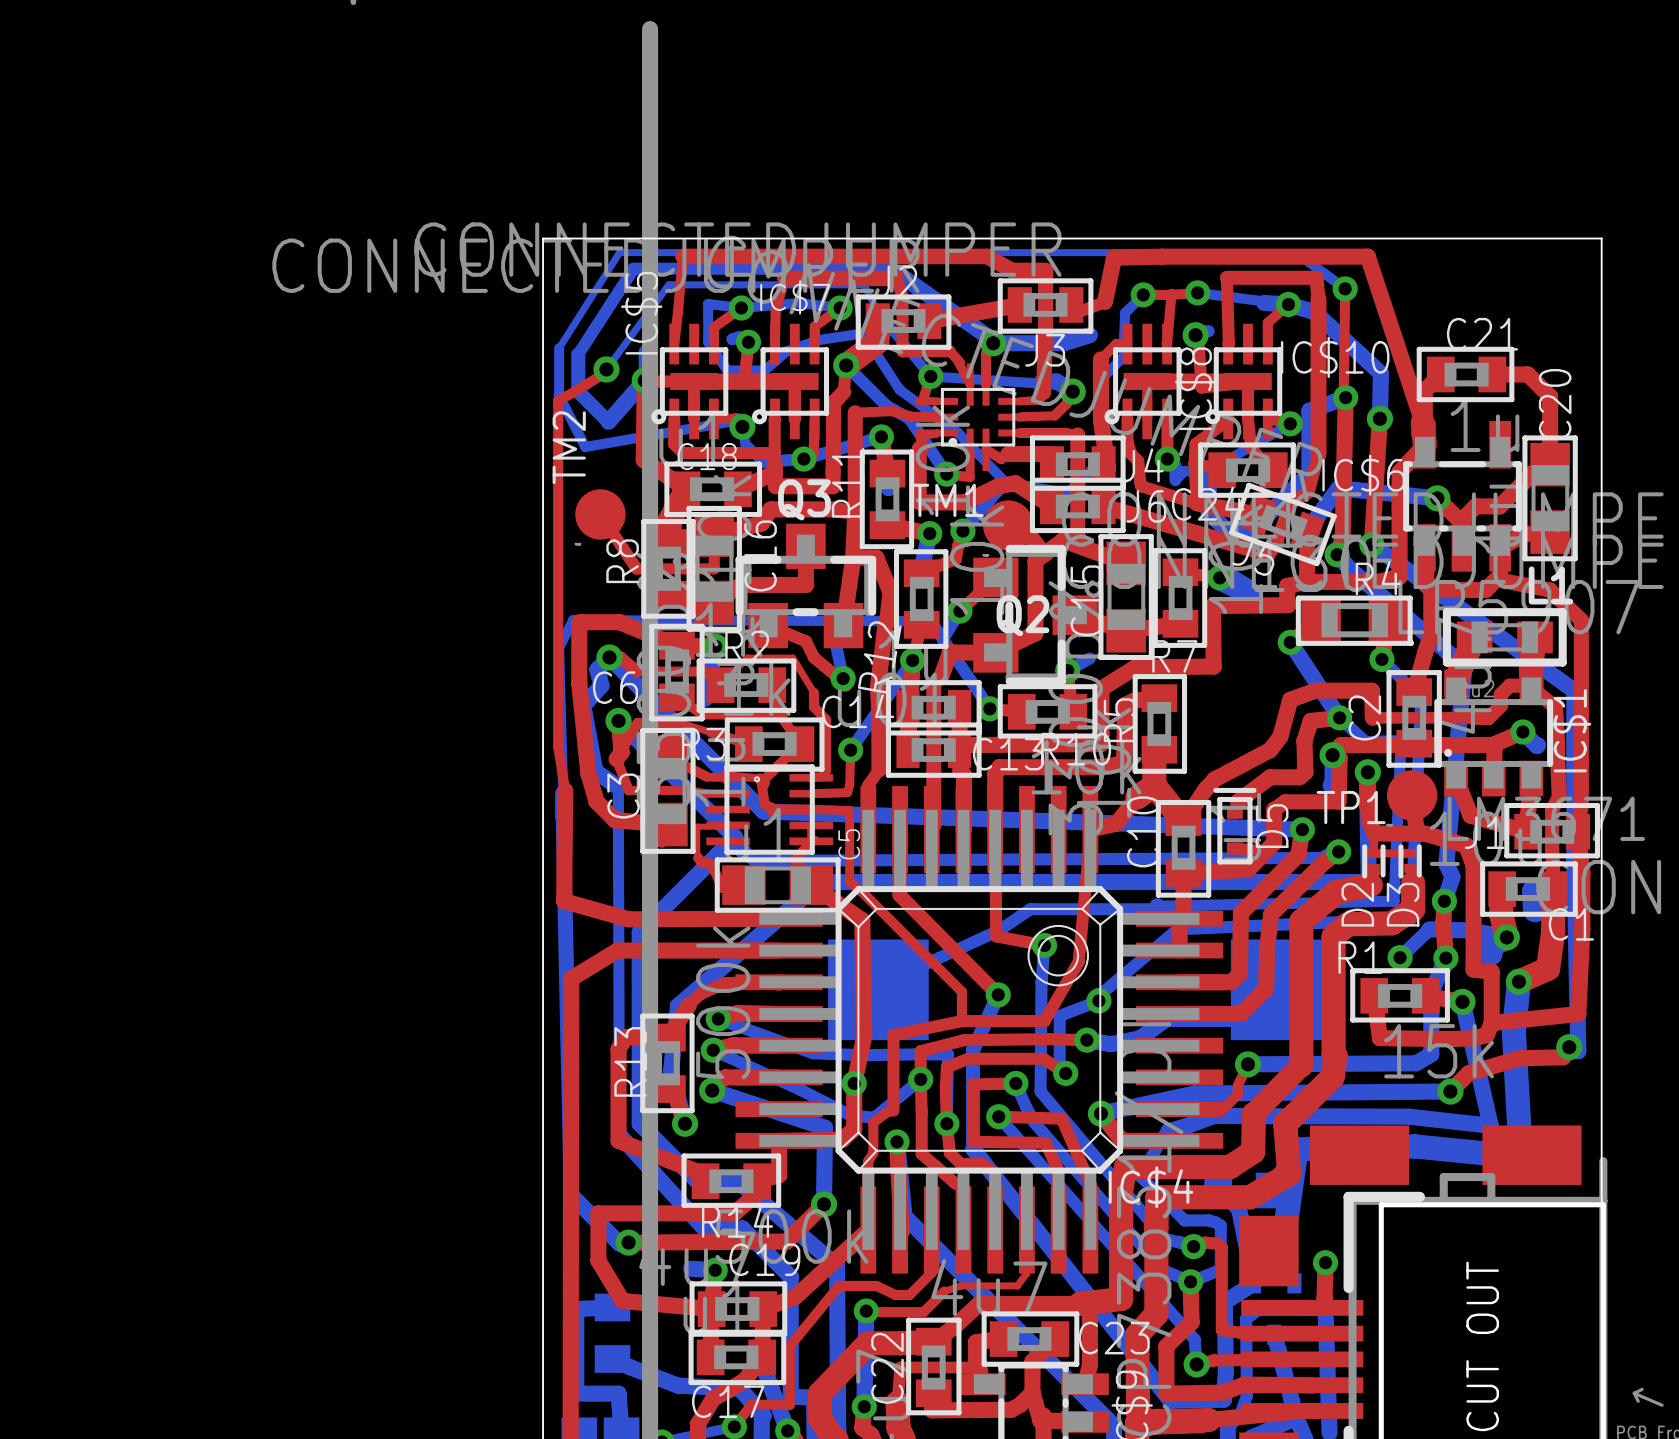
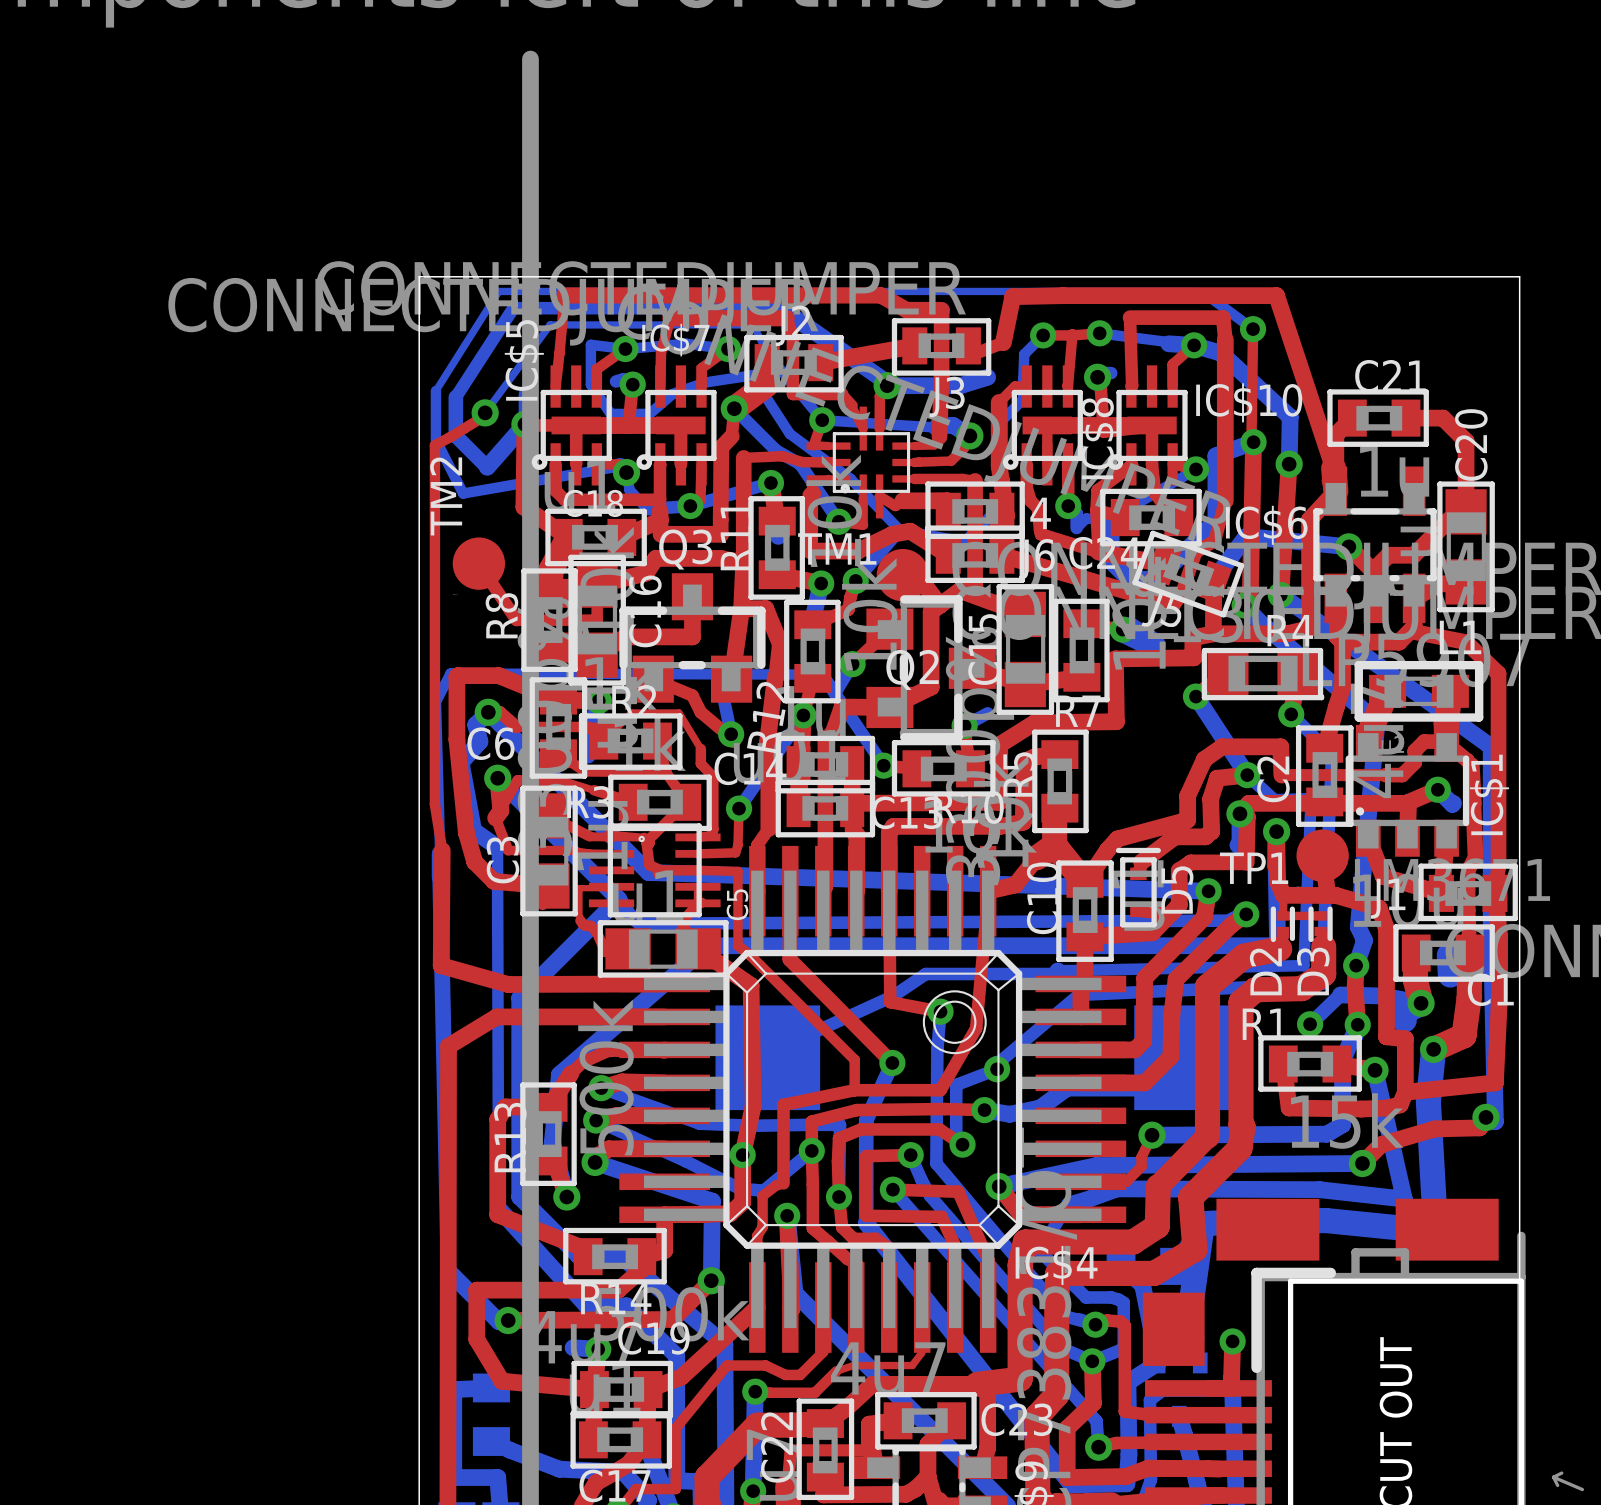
top track: (1315, 690) (1290, 699) (1280, 737) (1270, 750) (1214, 779) -> (1222, 746) (1204, 759) (1187, 796) (1187, 820) (1117, 838)

